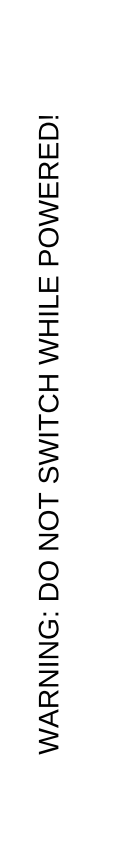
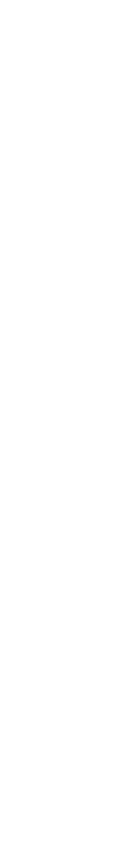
text: WARNING: DO NOT SWITCH WHILE POWERED! (48, 435) -> none

